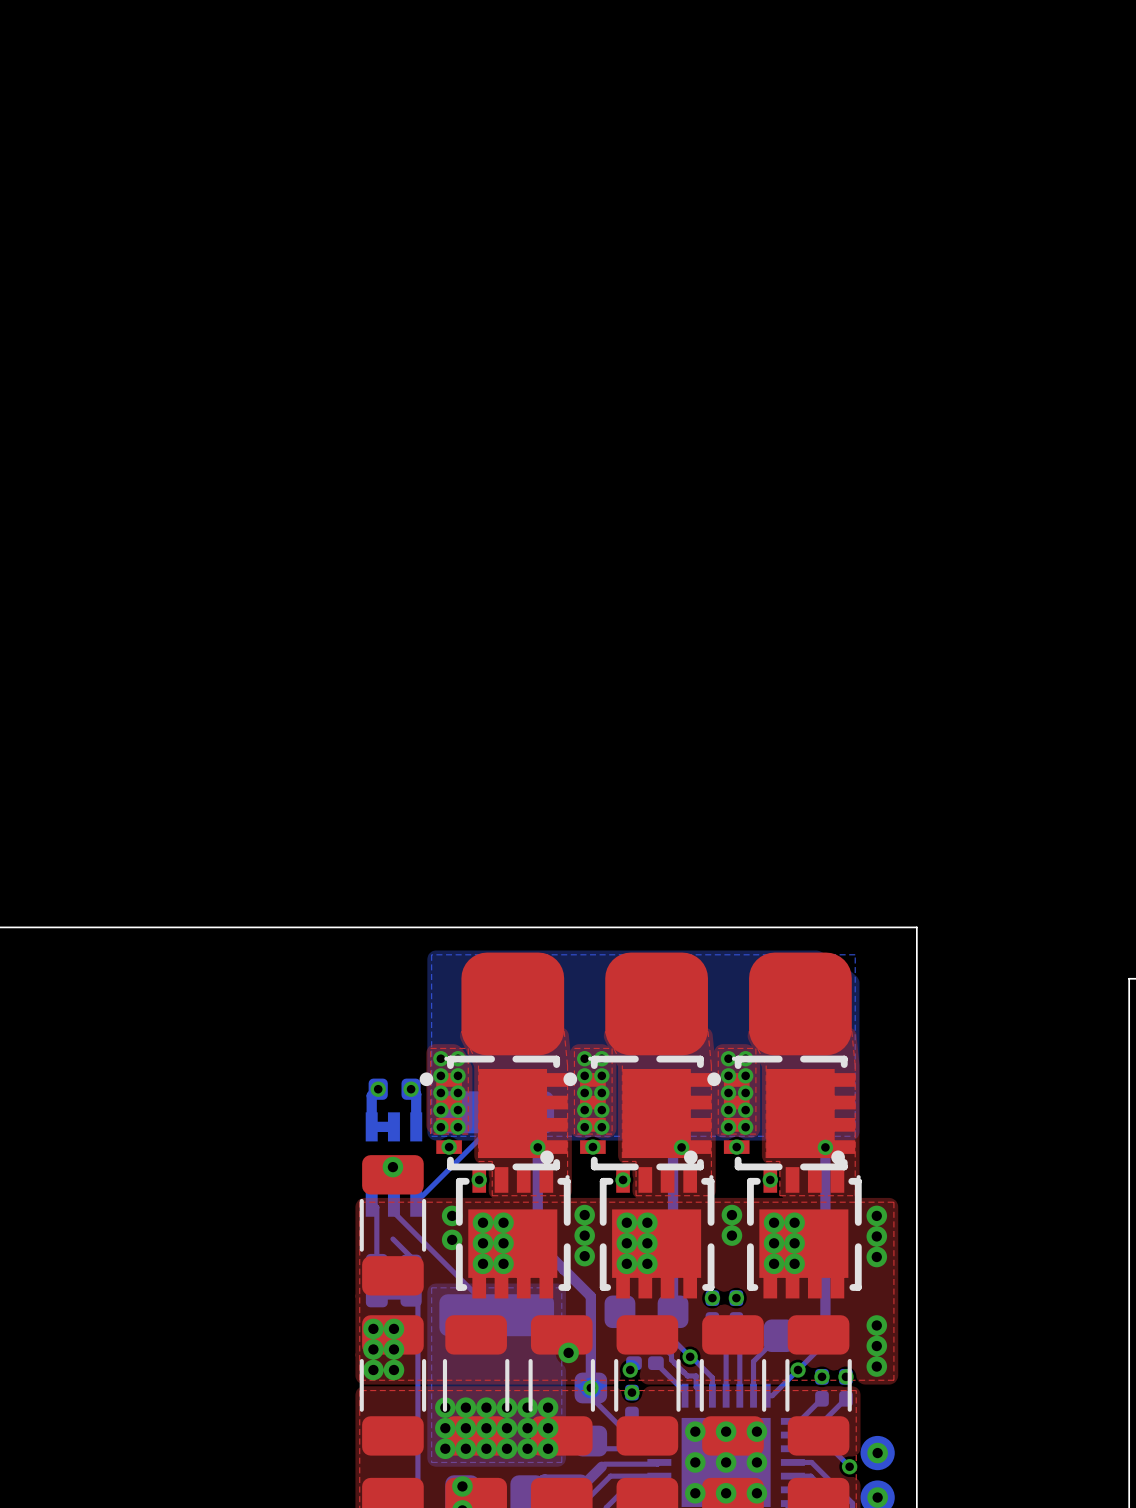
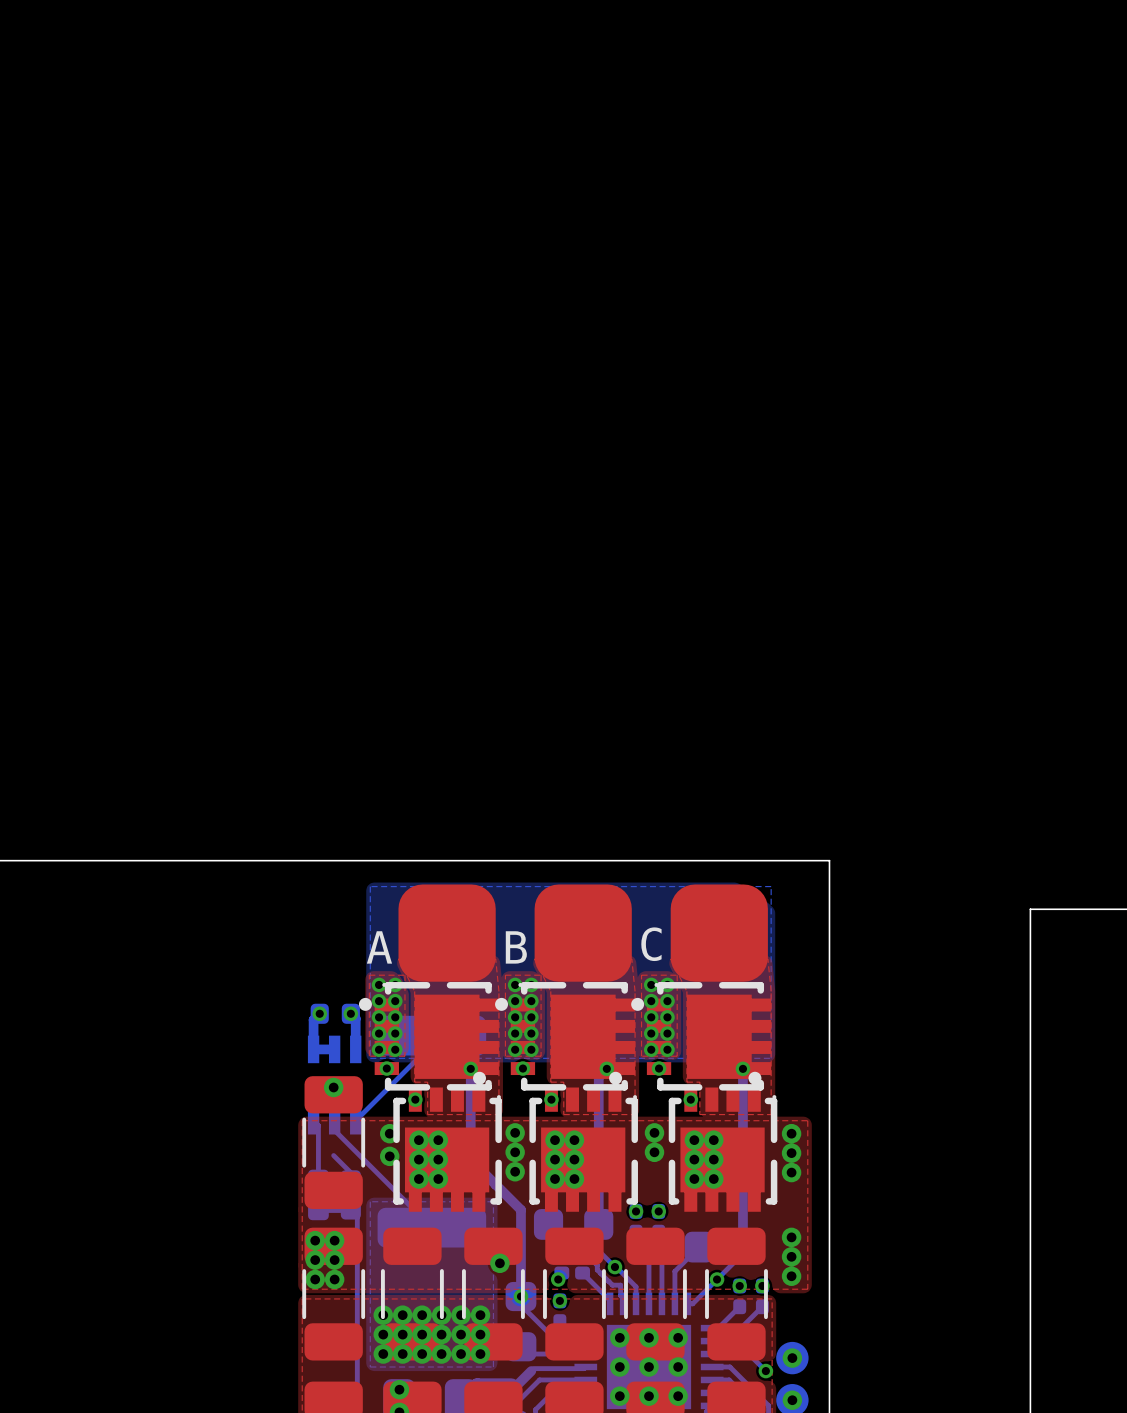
text: none -> C (651, 944)
text: none -> A (379, 947)
text: none -> B (516, 947)

